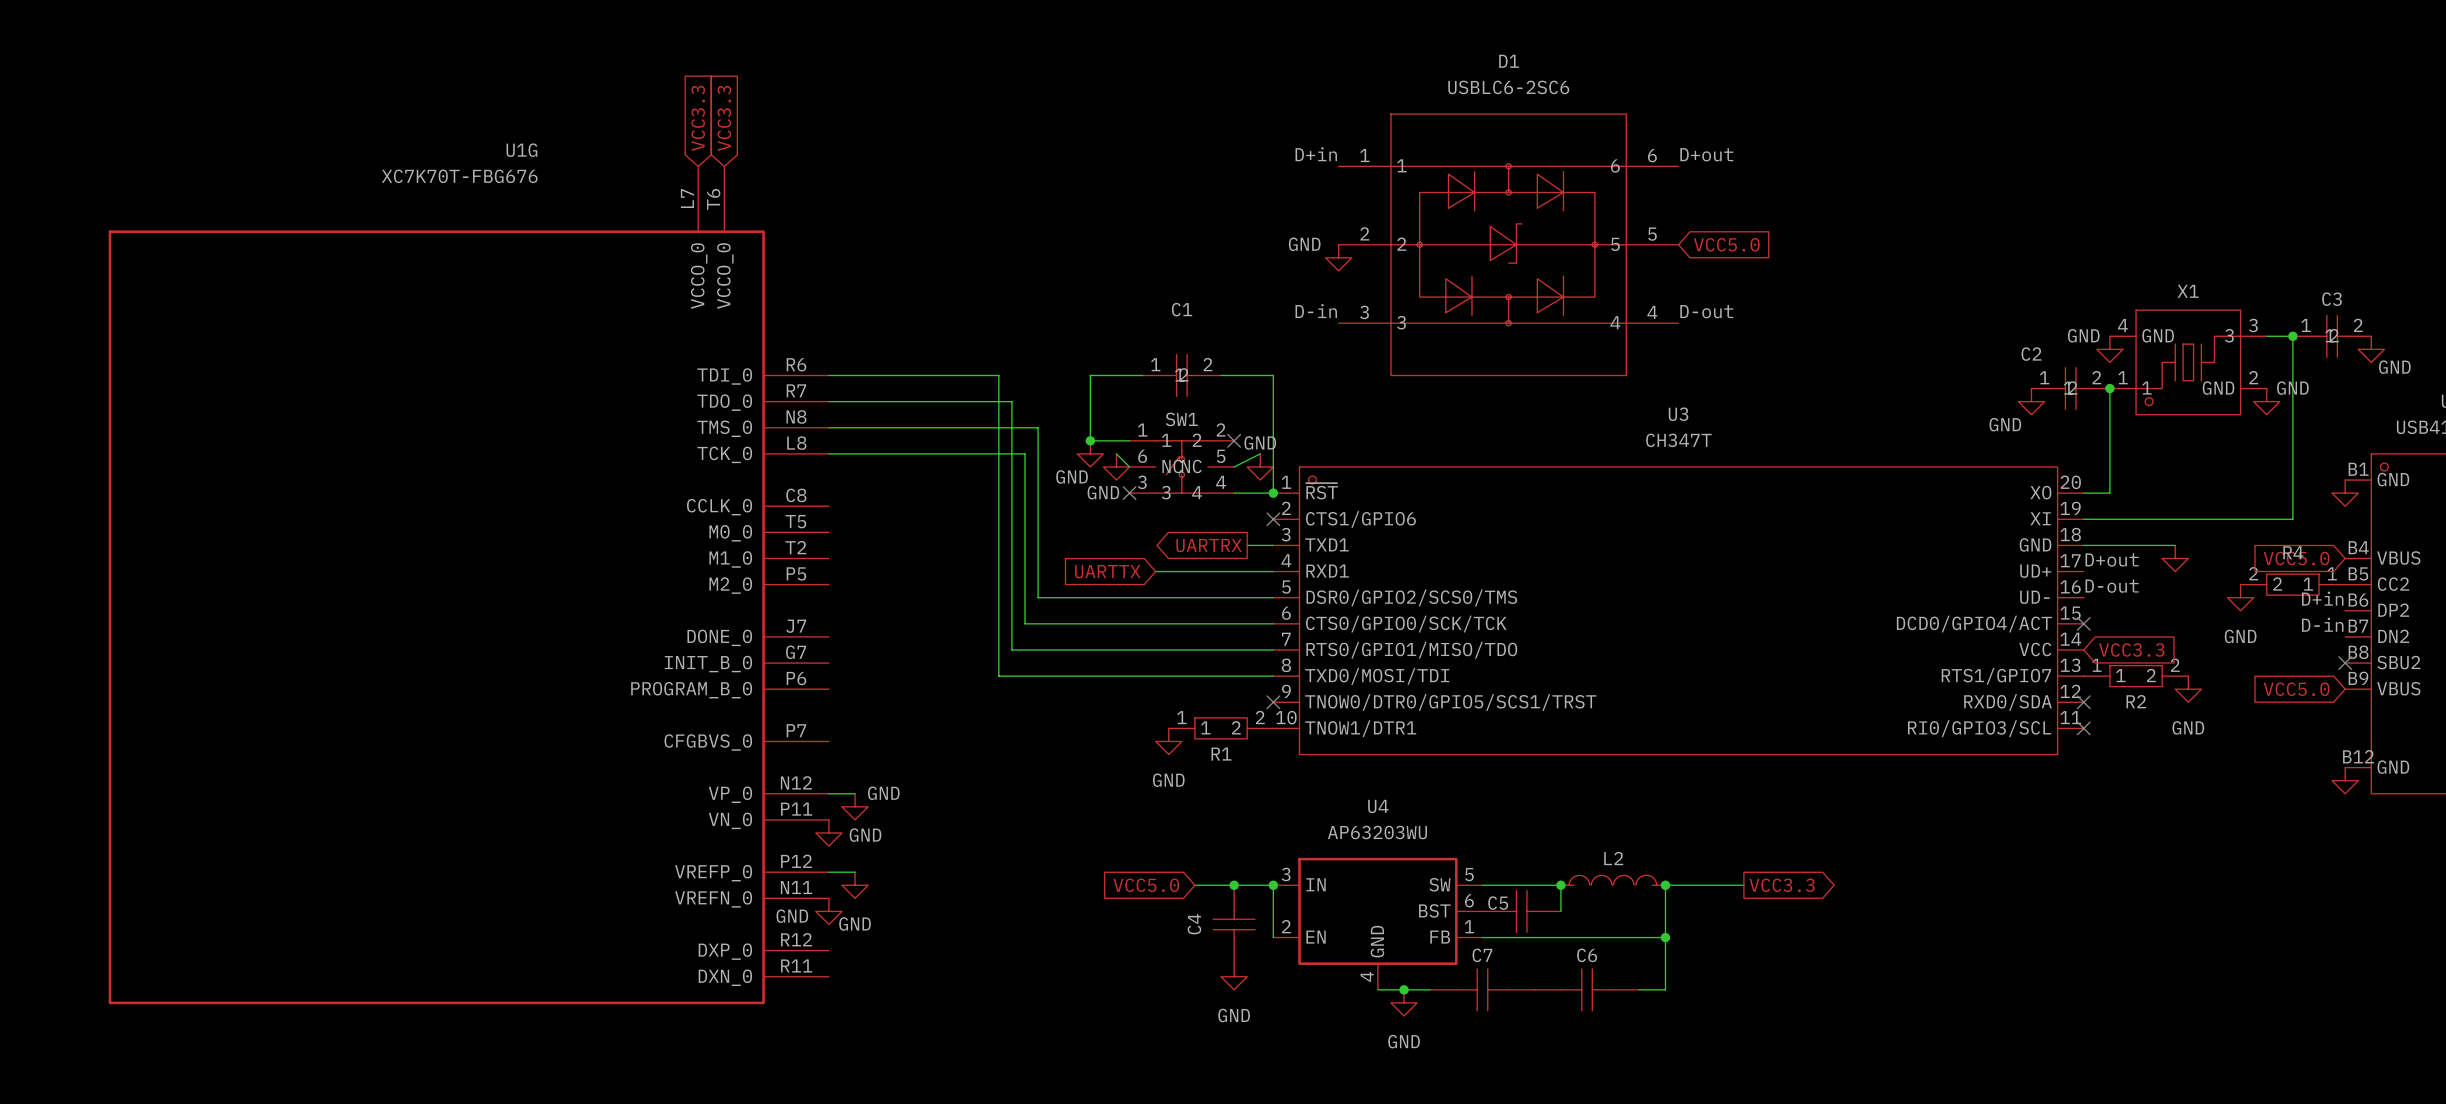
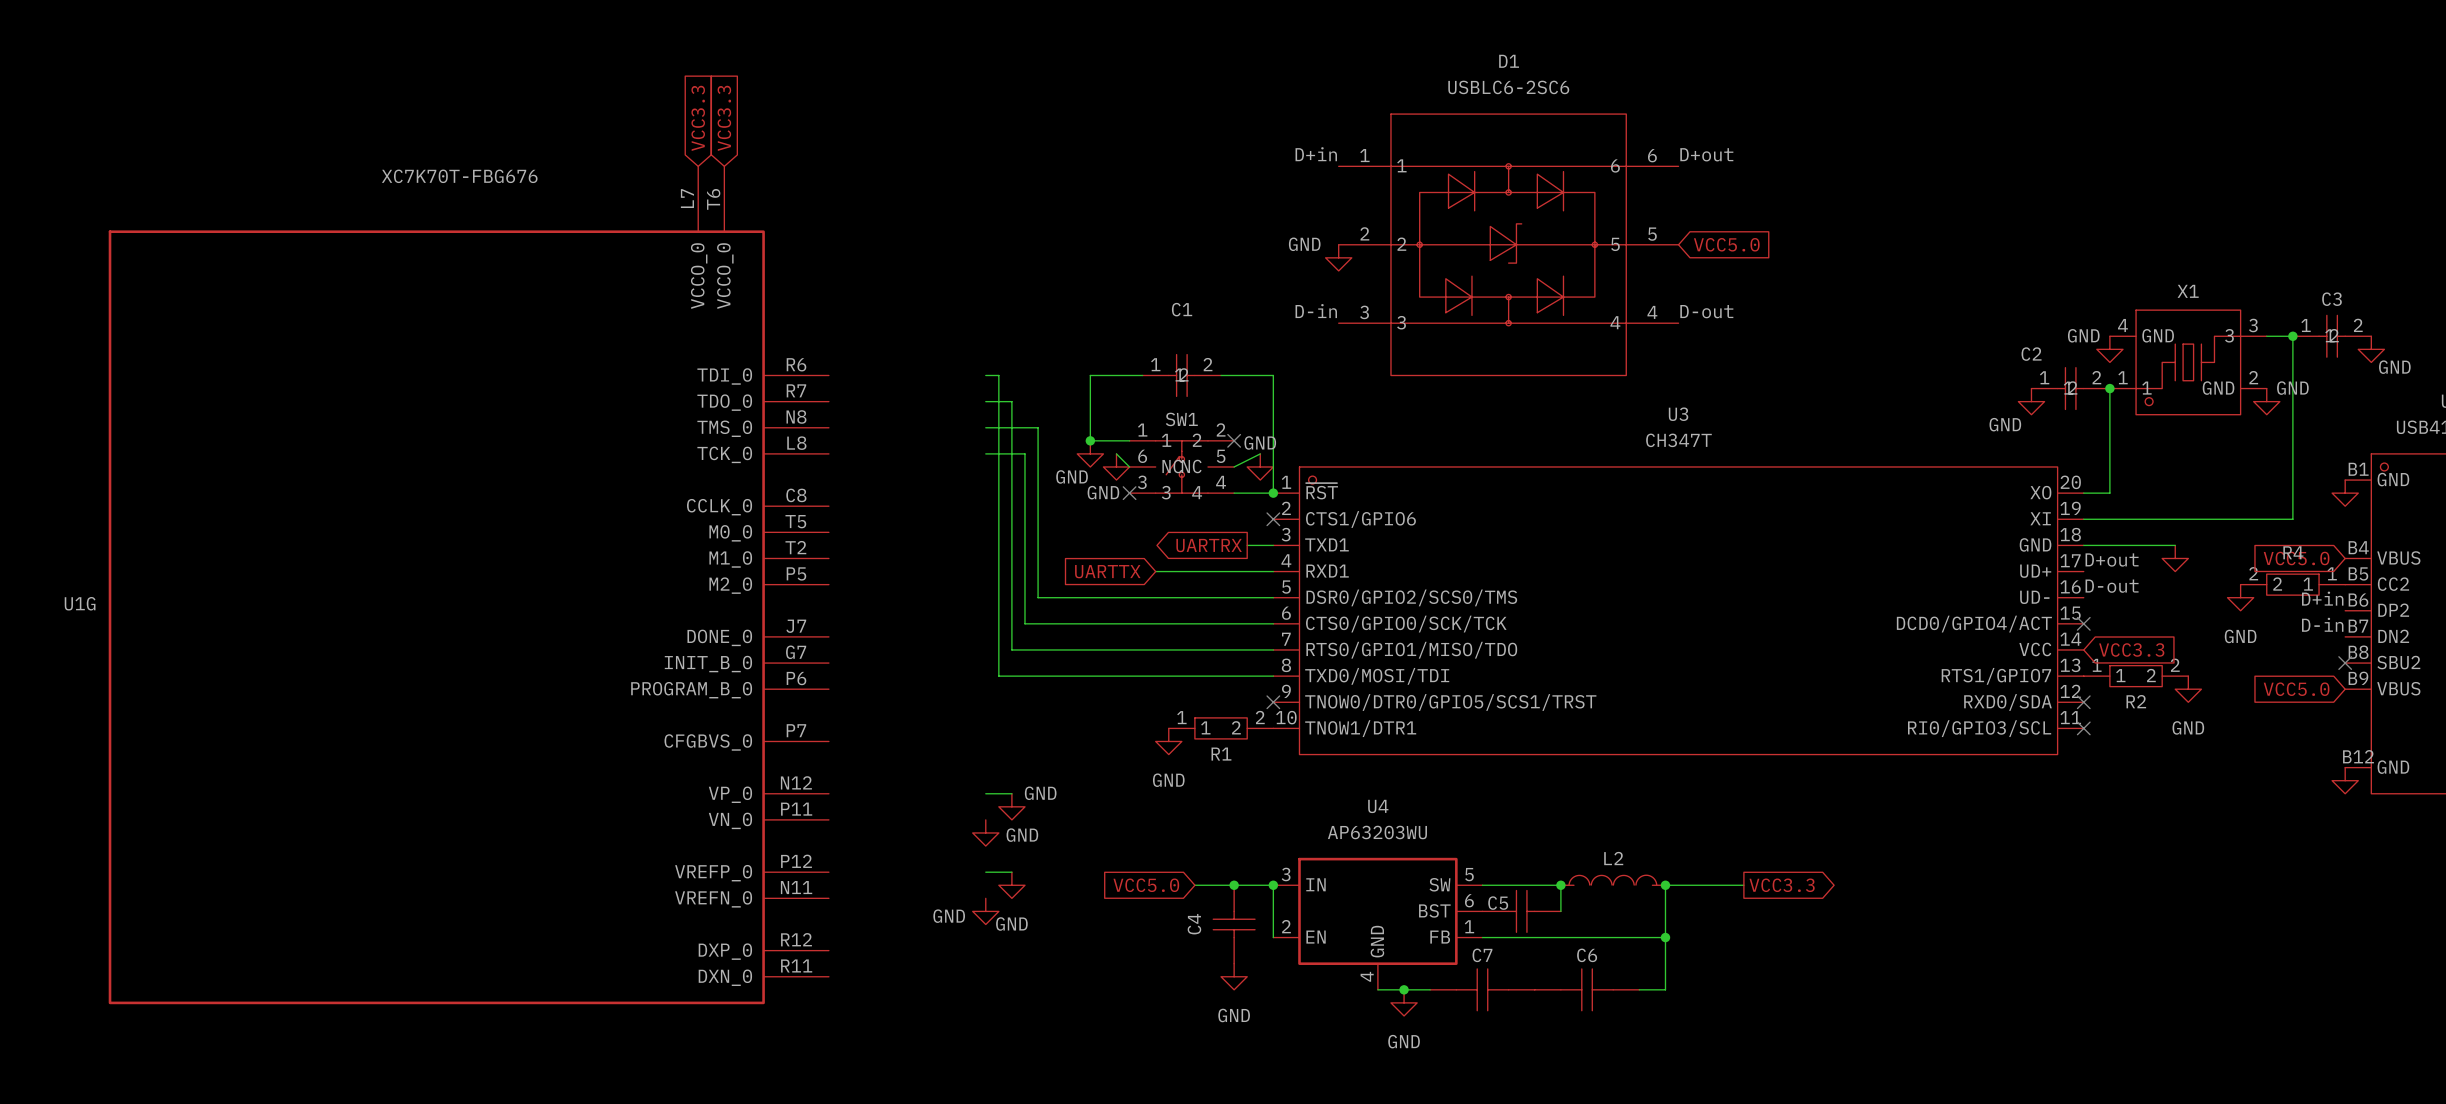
U1G name position: U1G (521, 150) -> U1G (80, 603)
wire: (828, 375) (985, 375) -> none
wire: (828, 401) (985, 401) -> none
wire: (828, 427) (985, 427) -> none
wire: (828, 453) (985, 453) -> none
wire: (828, 793) (855, 793) -> (985, 793) (1011, 793)
power symbol: GND (855, 806) -> none
power symbol: none -> GND (1011, 806)
power symbol: GND (828, 832) -> none
power symbol: none -> GND (985, 832)
wire: (828, 872) (855, 872) -> (985, 872) (1011, 872)
power symbol: GND (855, 885) -> none
power symbol: none -> GND (1011, 885)
power symbol: GND (828, 911) -> none
power symbol: none -> GND (985, 911)

